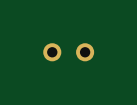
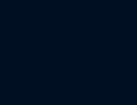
part: (68, 52) -> none

